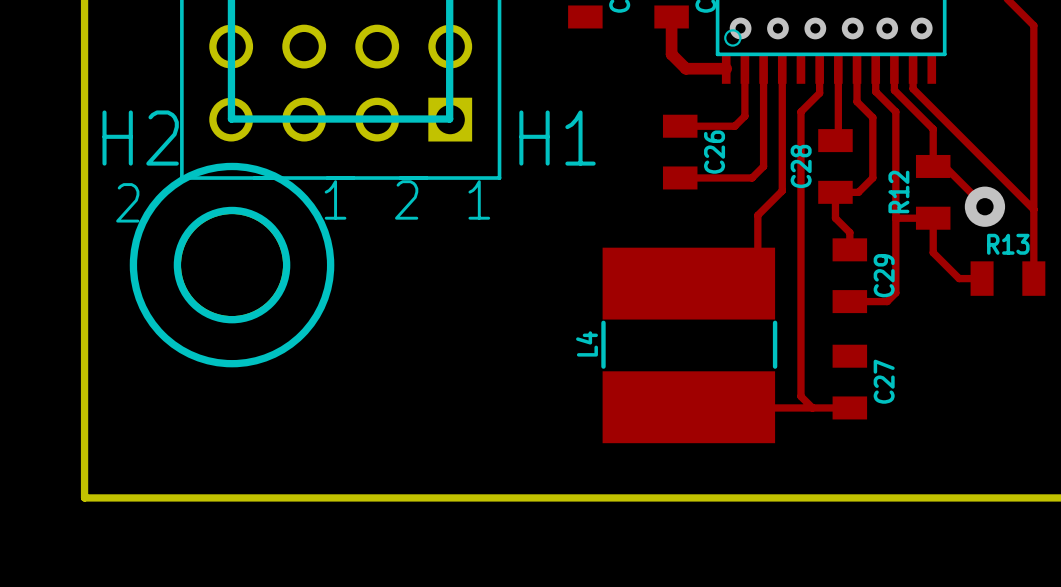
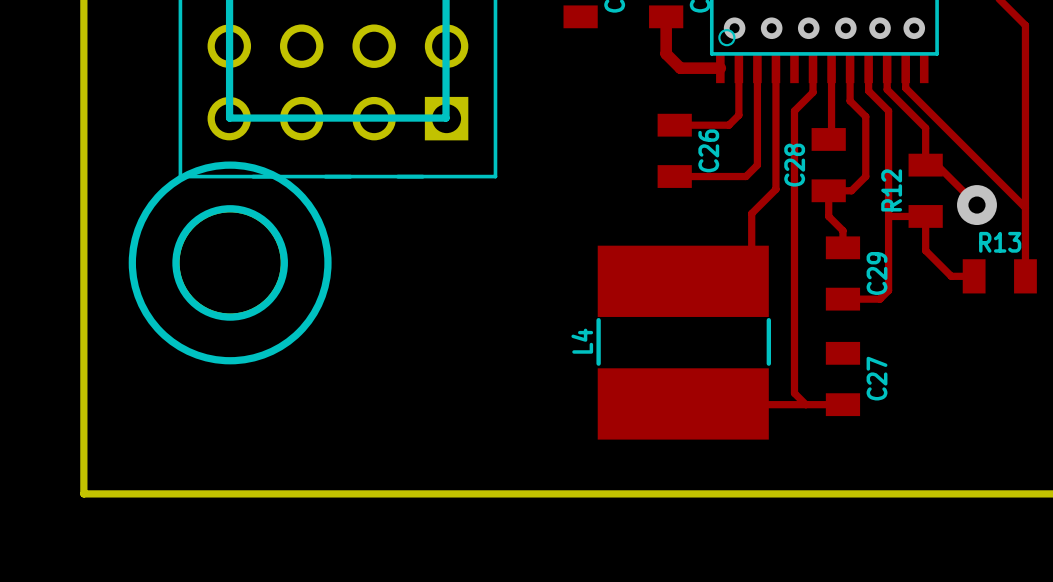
text: H2 (140, 138) -> none
text: H1 (557, 138) -> none
text: 1 (335, 199) -> none
text: 2 (406, 199) -> none
text: 1 (479, 199) -> none
text: 2 (127, 202) -> none

